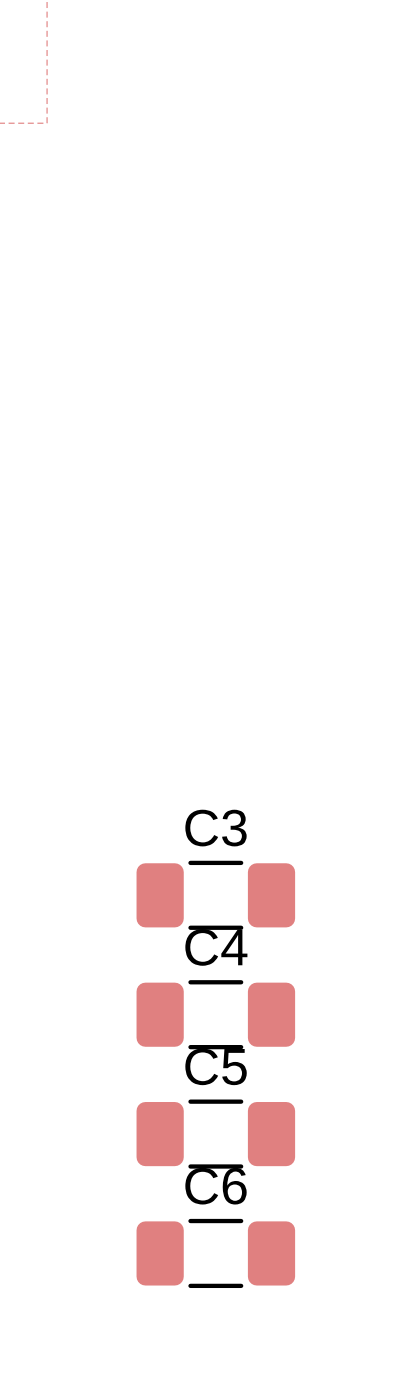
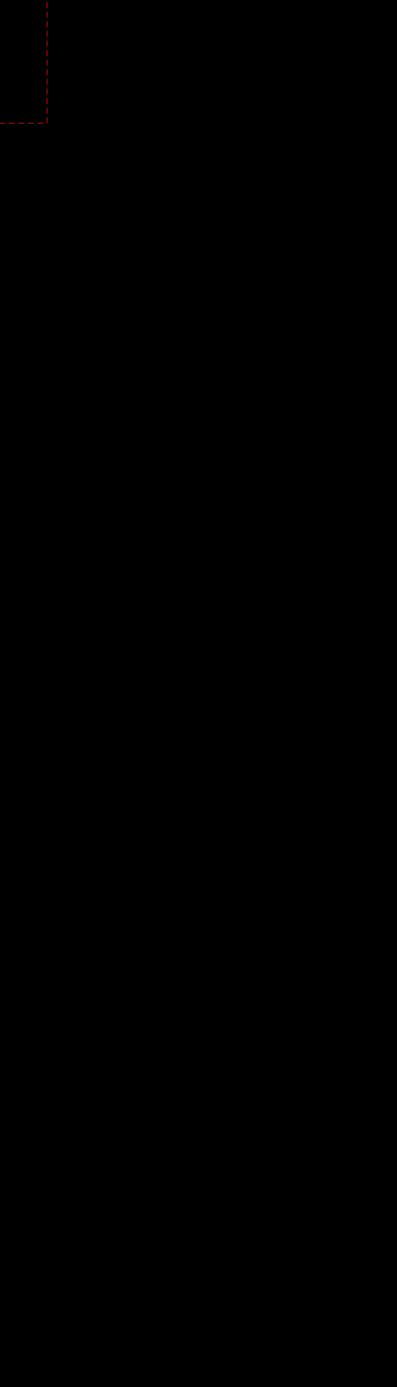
C3: (215, 895) -> none
C4: (215, 1014) -> none
C5: (215, 1134) -> none
C6: (215, 1253) -> none

